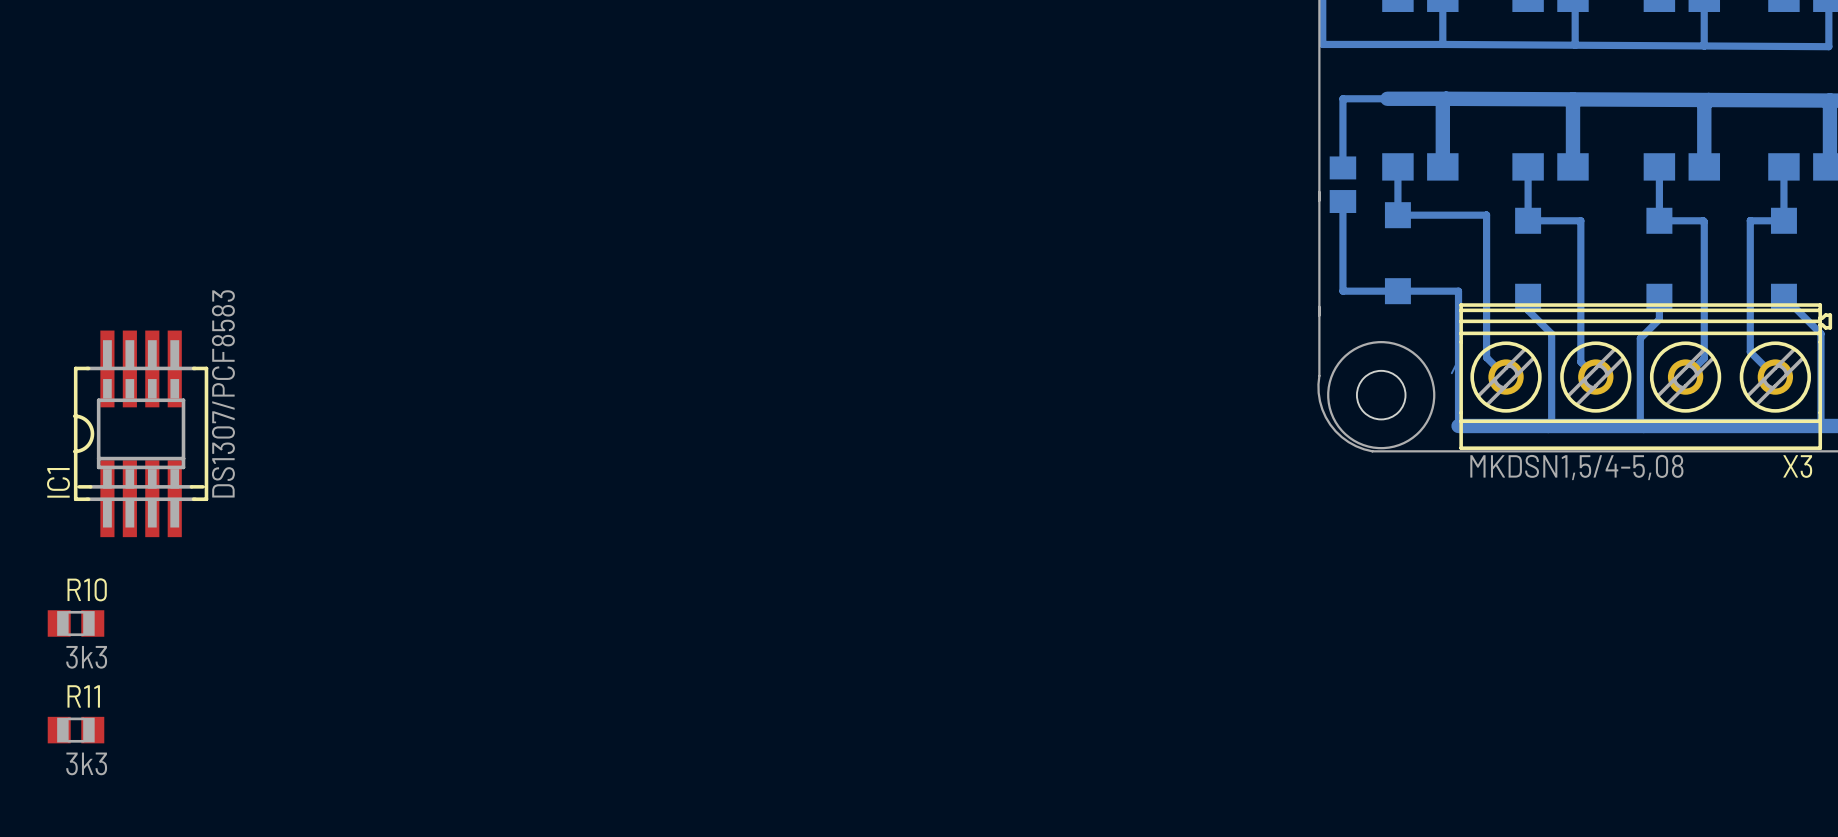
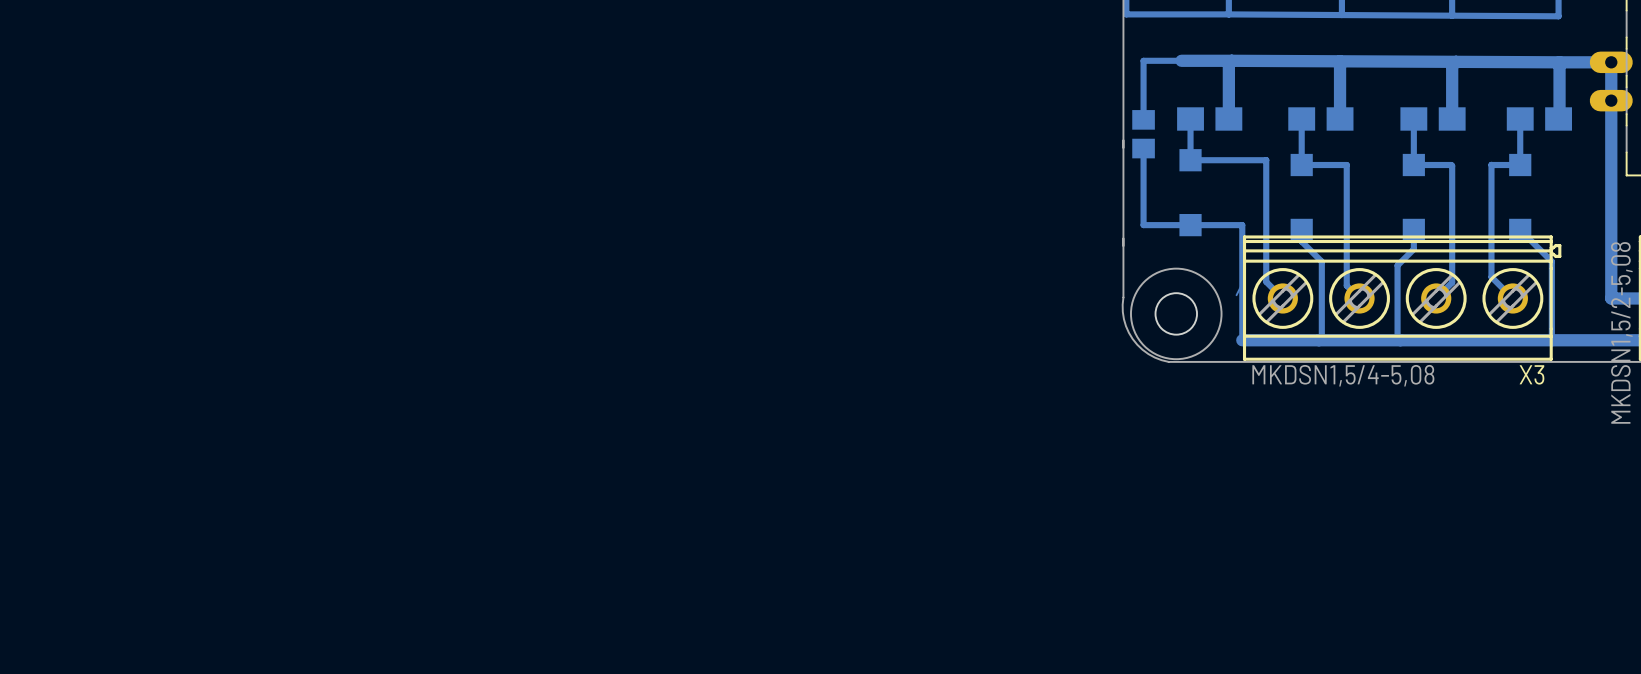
IC1: DS1307/PCF8583 (140, 433) -> none
R10: 3k3 (76, 623) -> none
R11: 3k3 (76, 730) -> none

